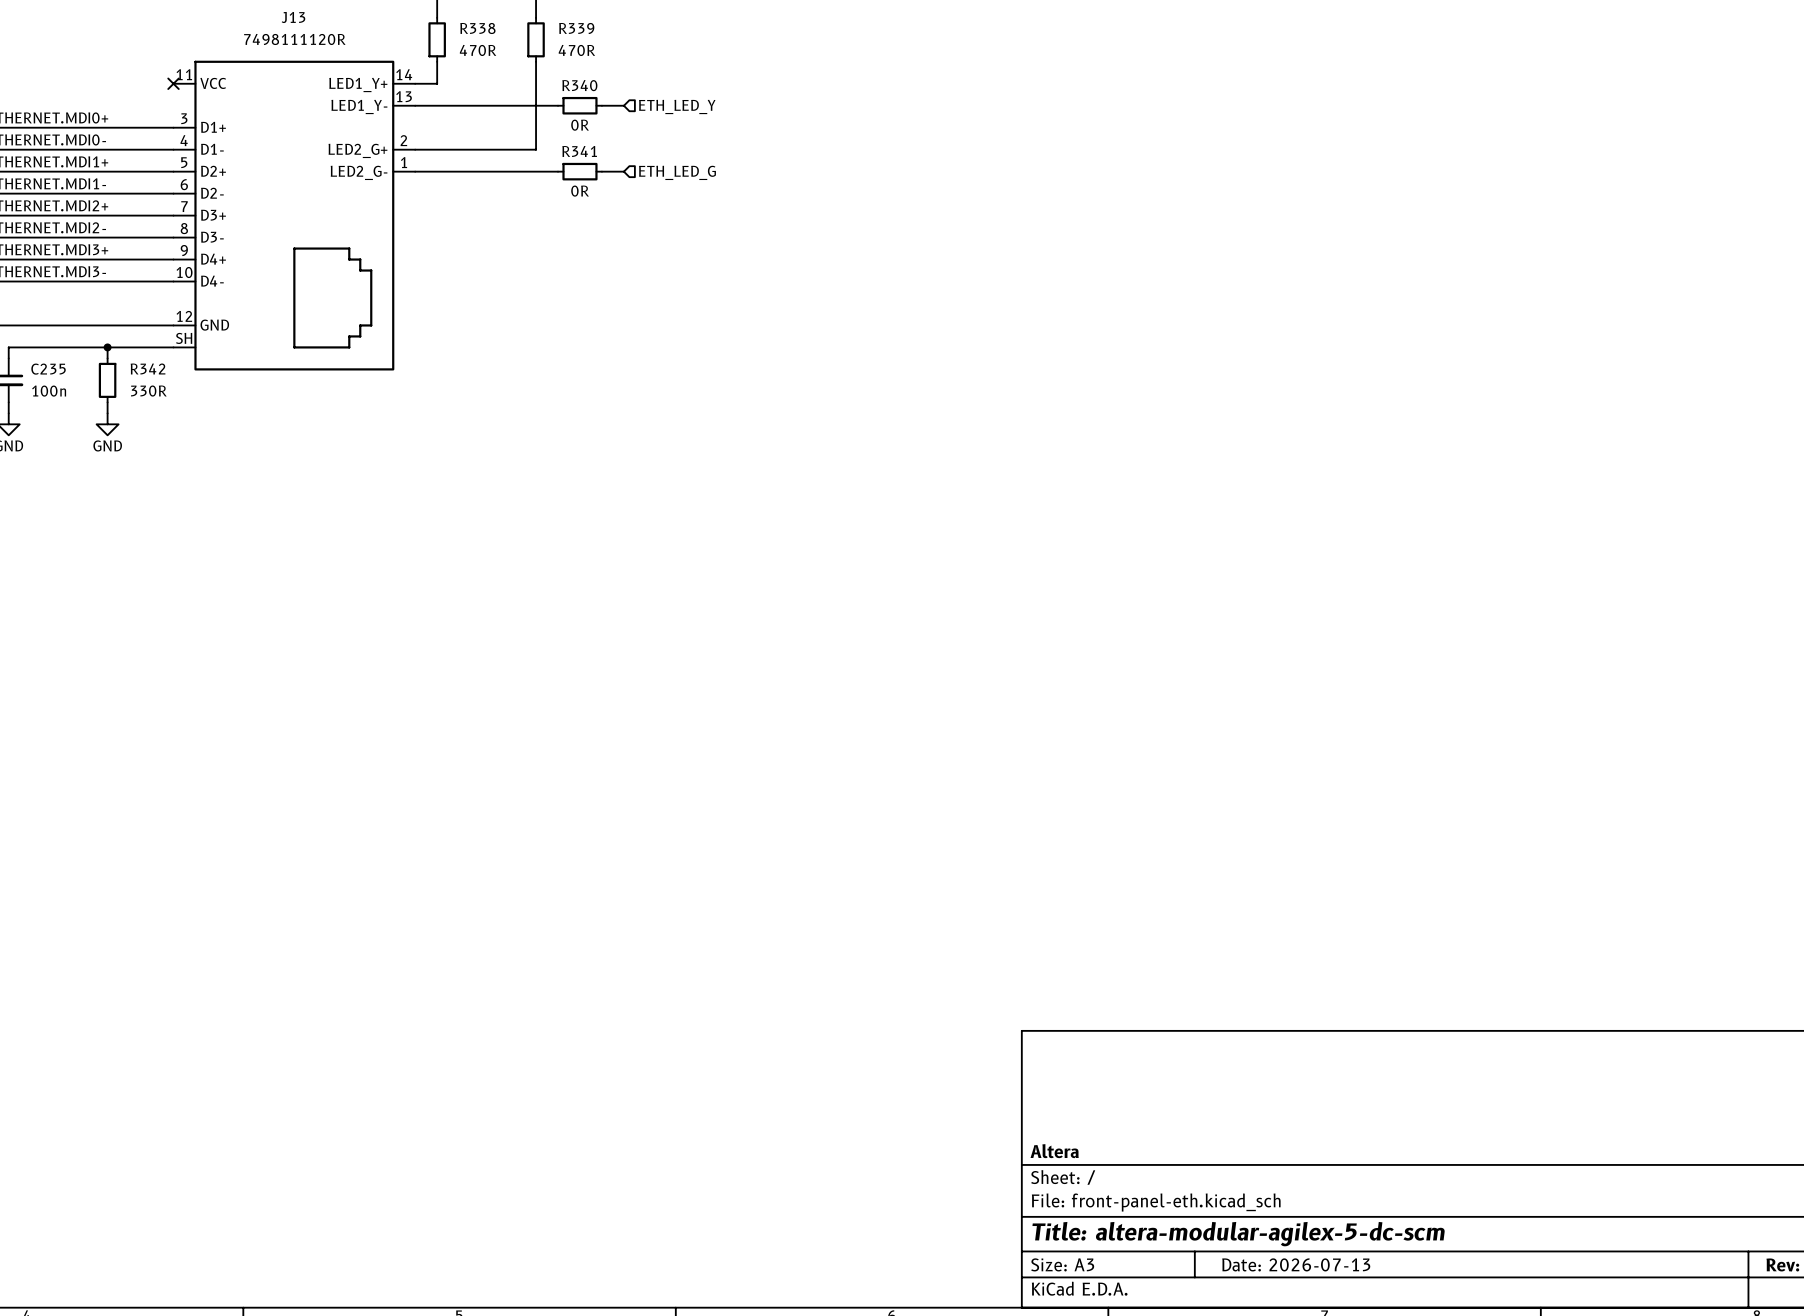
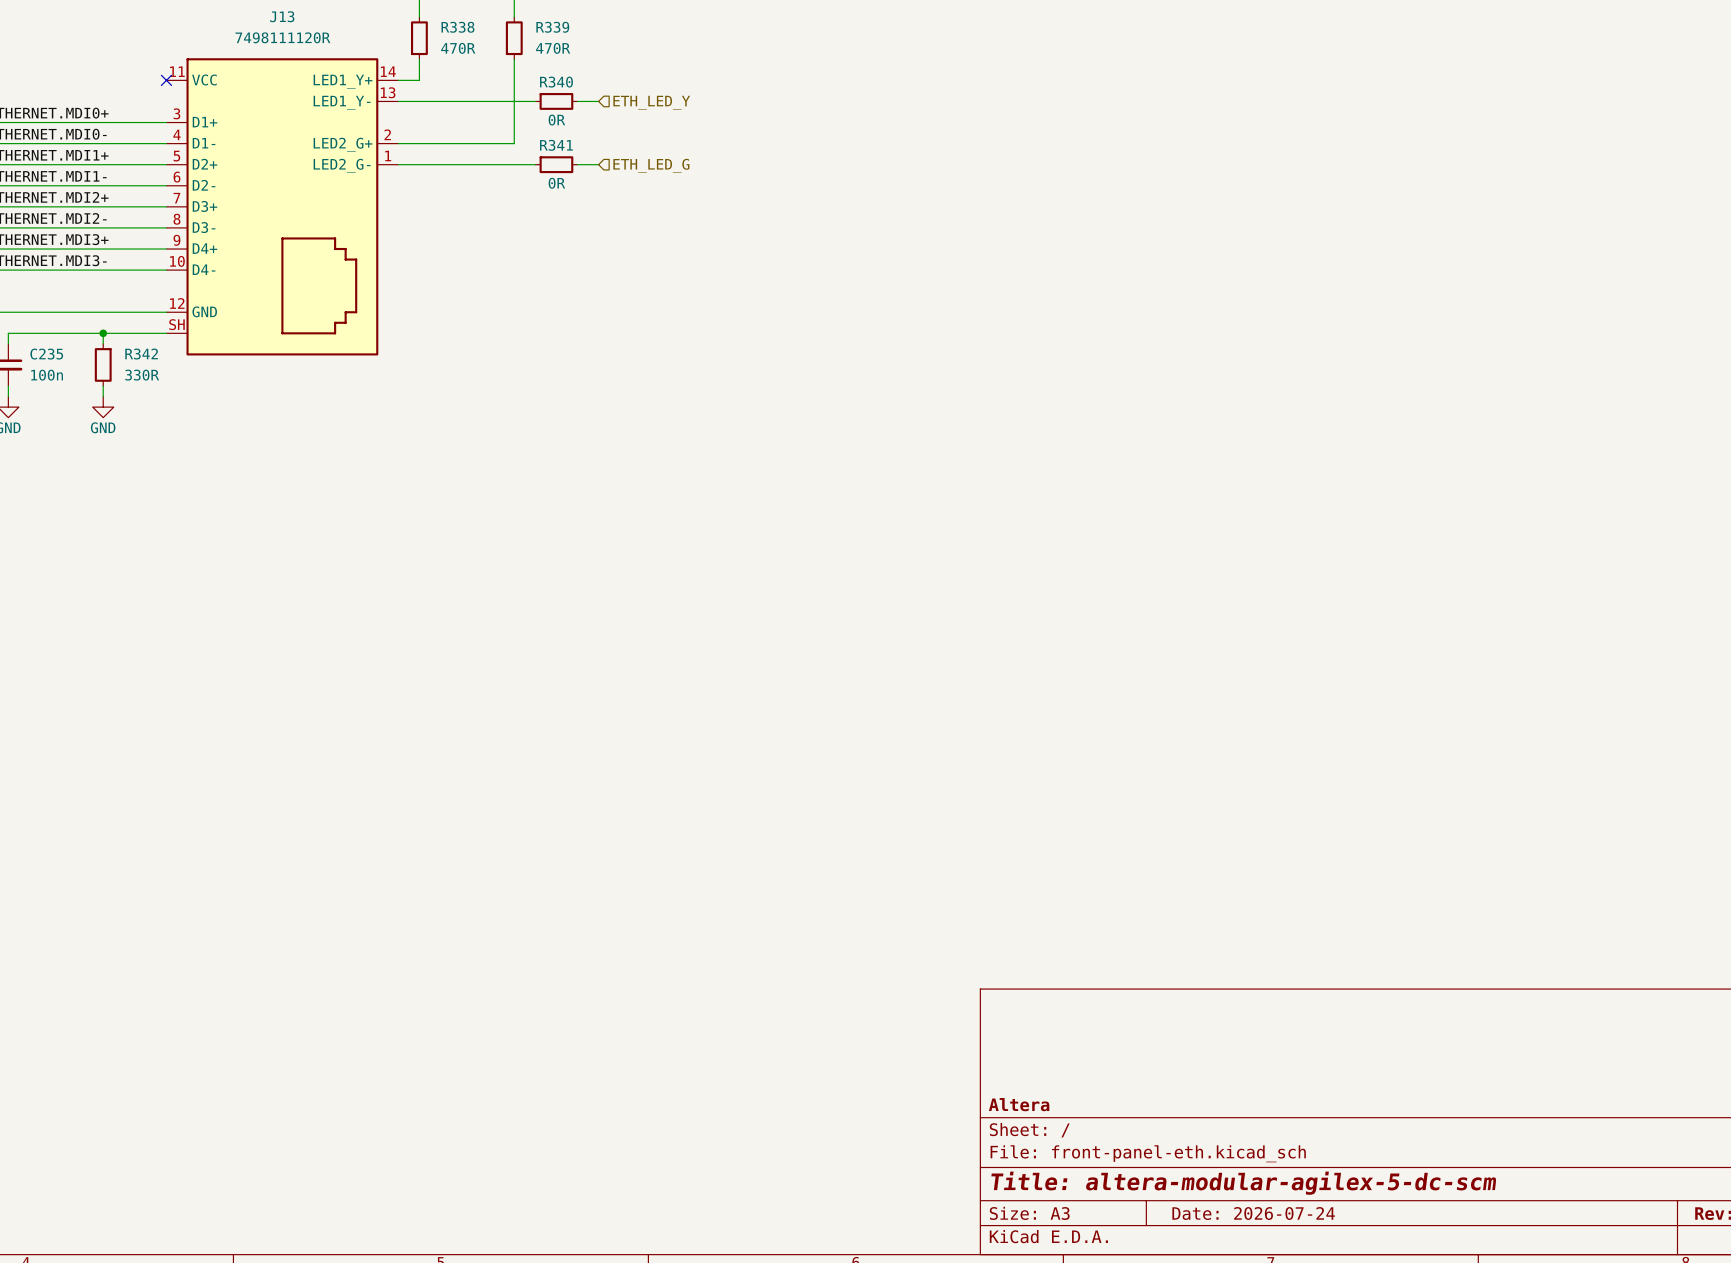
title block: Date: 2026-07-13 (1296, 1264) -> Date: 2026-07-24 (1253, 1213)

